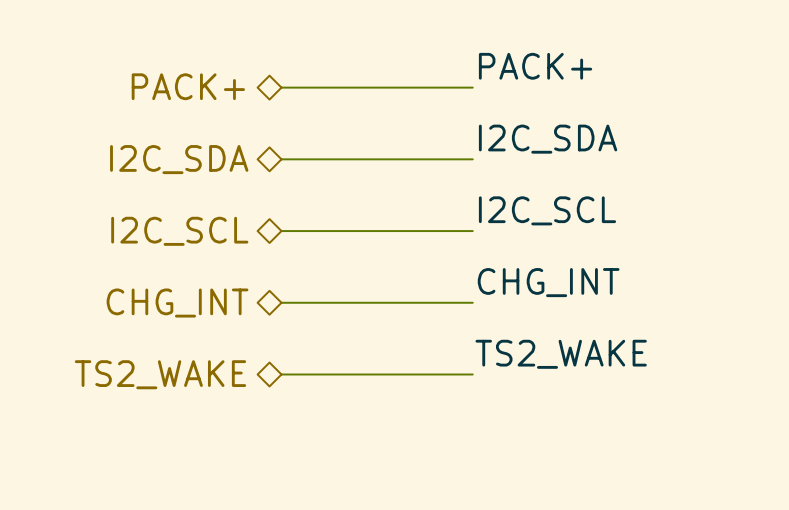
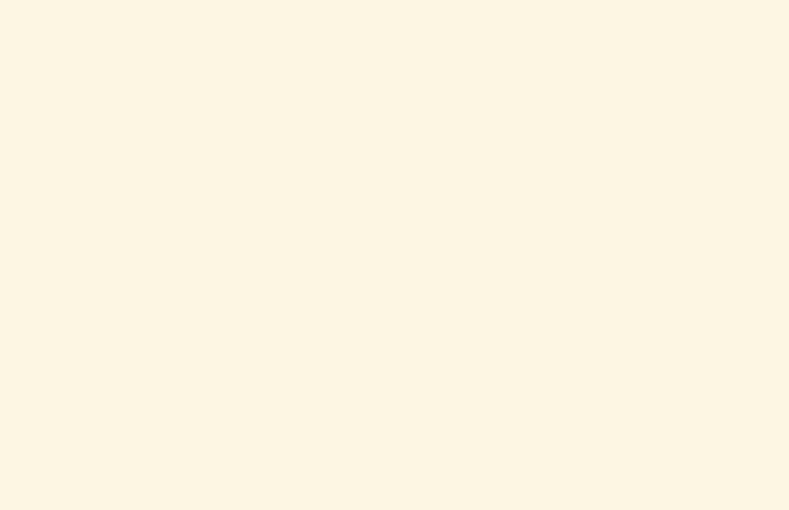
label: PACK+ (535, 66) -> none
hierarchical label: PACK+ (188, 86) -> none
wire: (281, 87) (472, 87) -> none
label: I2C_SDA (548, 139) -> none
hierarchical label: I2C_SDA (179, 159) -> none
wire: (281, 159) (472, 159) -> none
label: I2C_SCL (547, 210) -> none
hierarchical label: I2C_SCL (179, 231) -> none
wire: (281, 231) (472, 231) -> none
label: CHG_INT (548, 282) -> none
wire: (281, 302) (472, 302) -> none
hierarchical label: CHG_INT (177, 303) -> none
label: TS2_WAKE (561, 354) -> none
hierarchical label: TS2_WAKE (160, 374) -> none
wire: (281, 374) (472, 374) -> none

